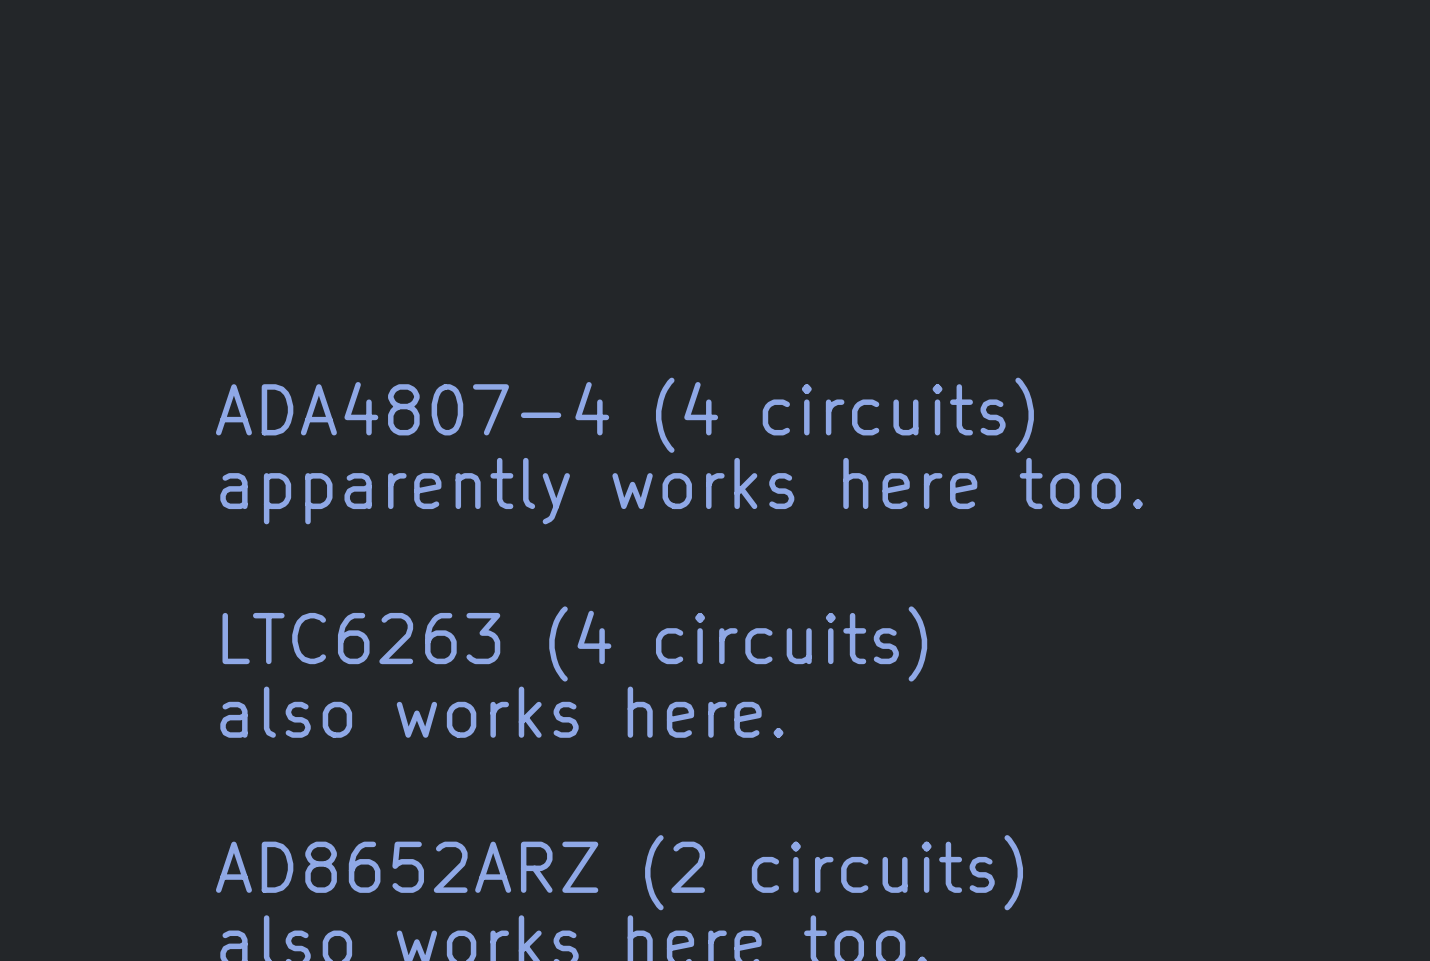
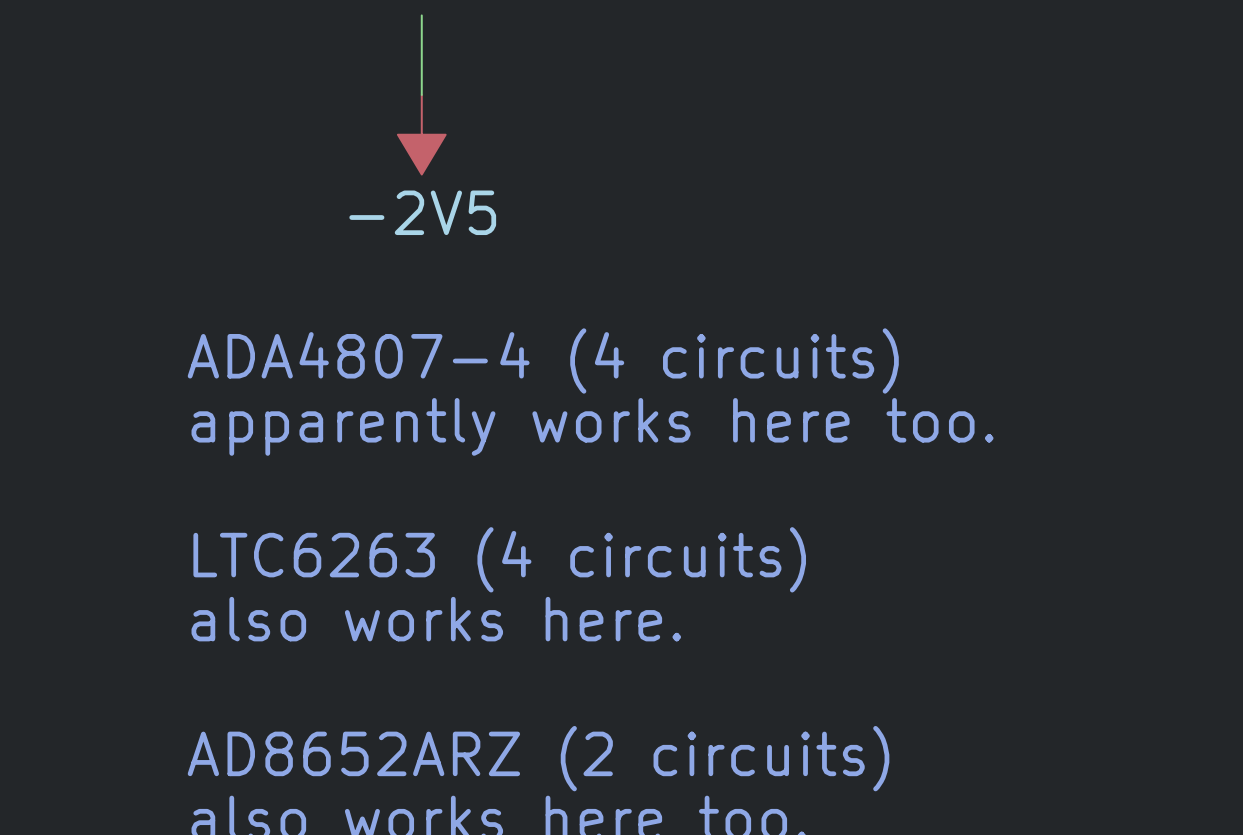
wire: none -> (421, 15) (421, 94)
power symbol: none -> -2V5 (421, 134)

